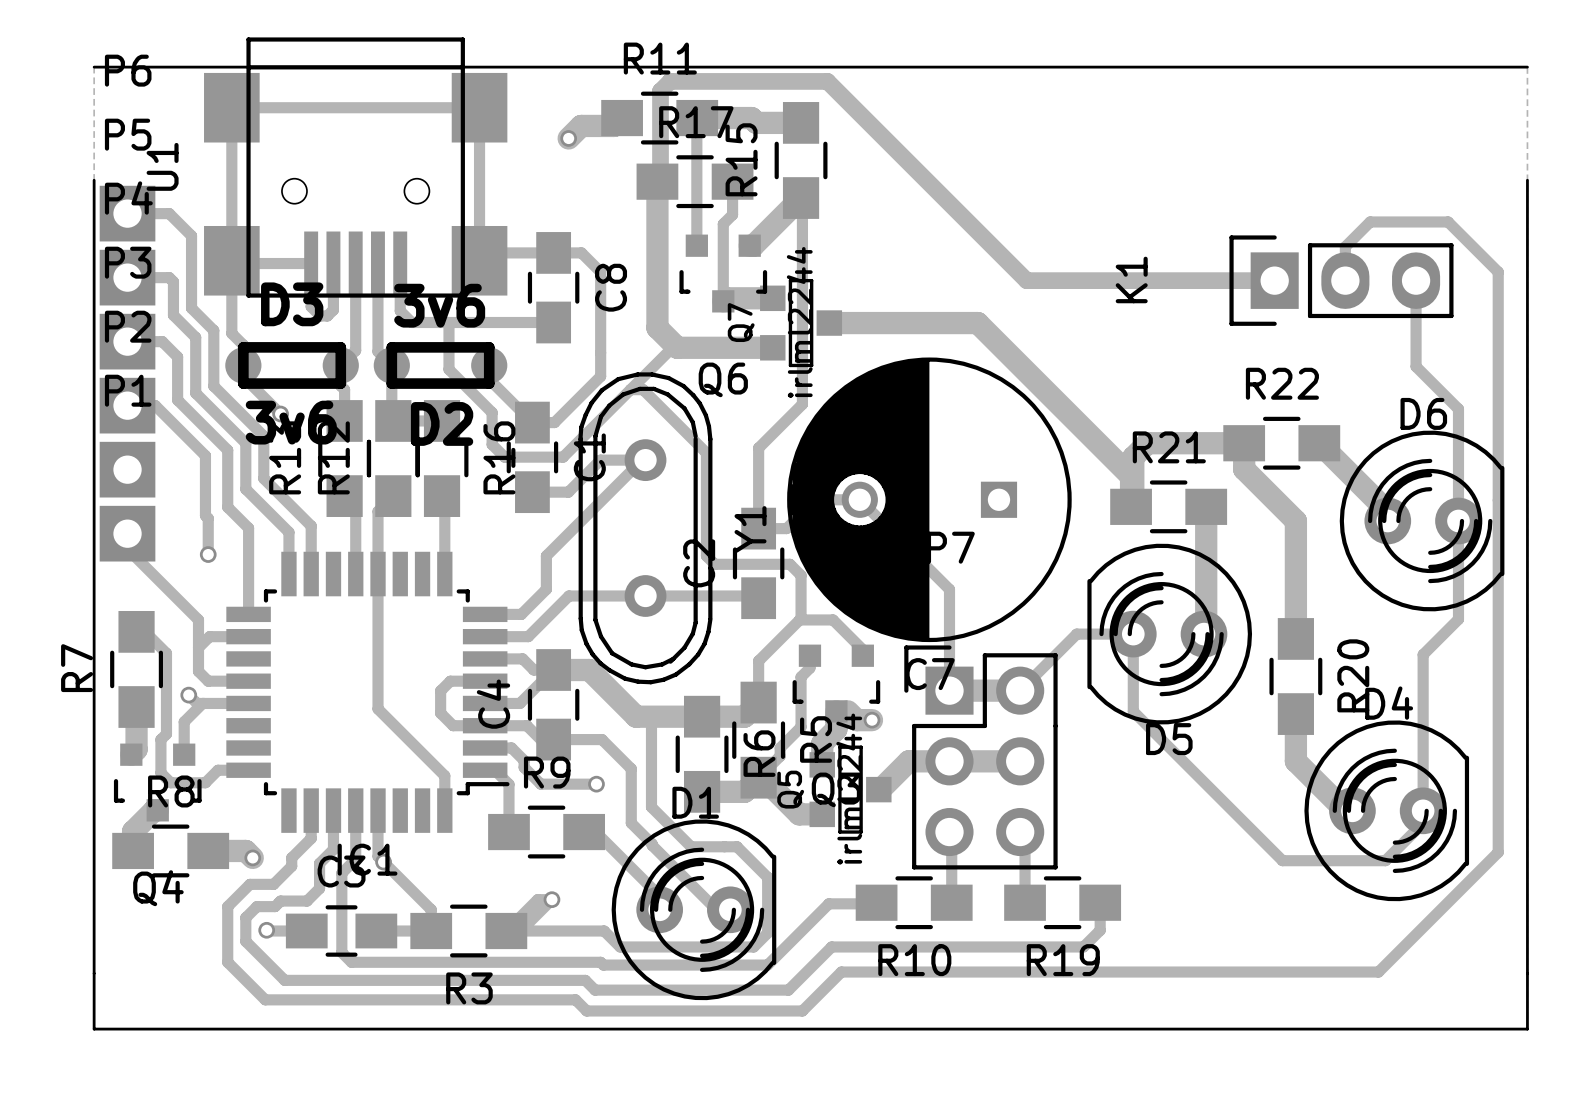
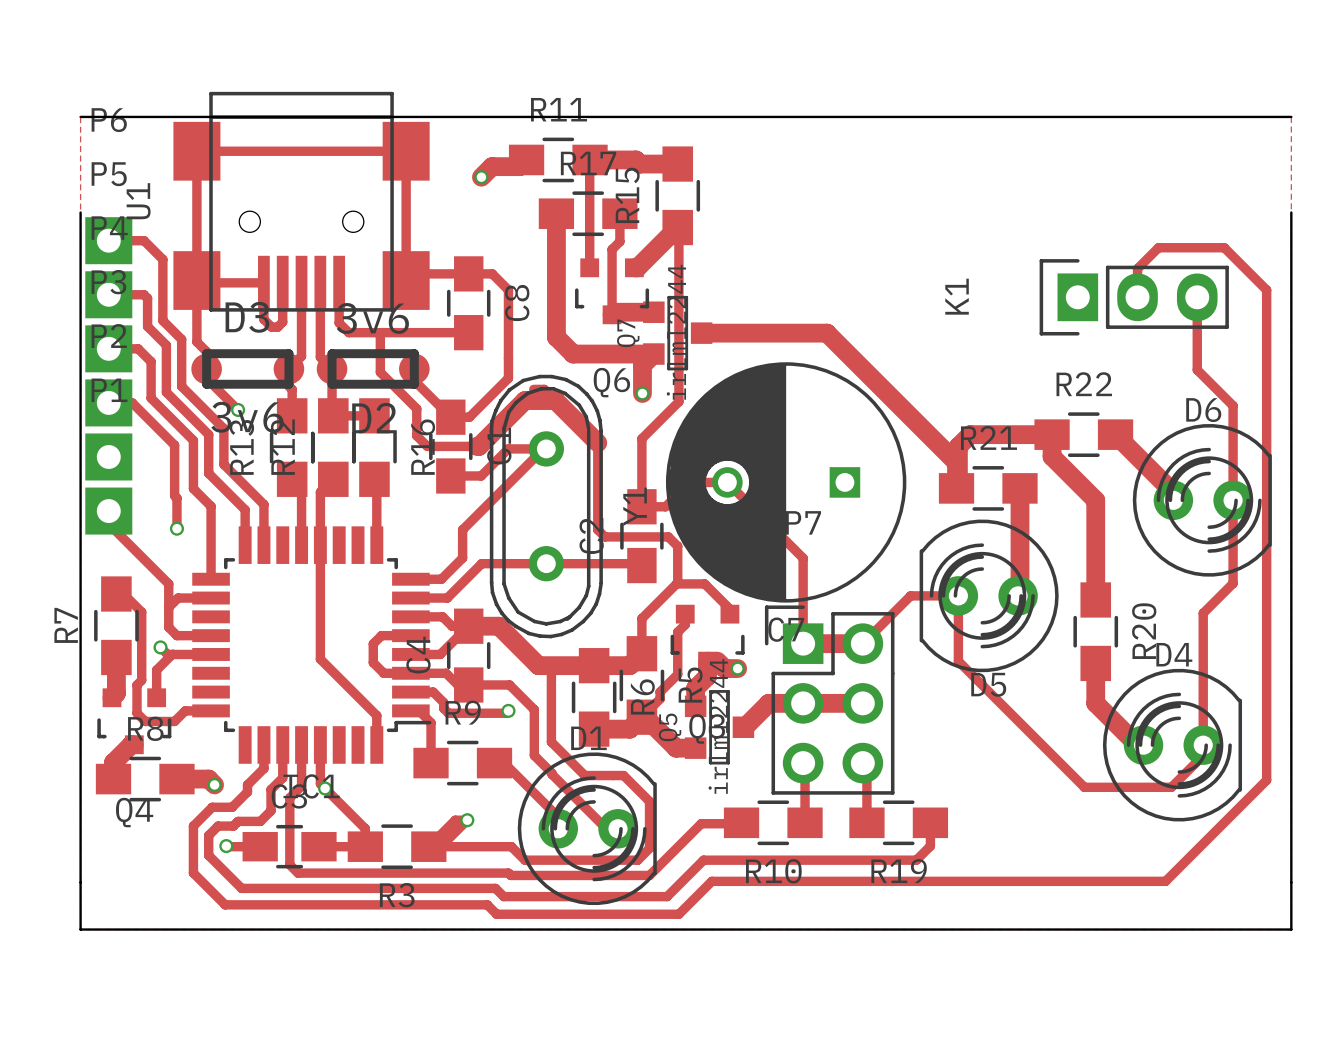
track: (660, 178) (660, 91) (670, 81) (827, 81) (1026, 280) (1274, 280) -> none
track: (672, 347) (563, 457) -> (555, 400) (524, 400) (479, 446) (476, 446)
track: none -> (653, 354) (642, 365) (642, 393)
via: none -> (642, 393)
track width: thin (656, 402) (706, 452) -> thick (555, 400) (597, 442)
track: (529, 773) (540, 784) (596, 784) -> (448, 713) (506, 713) (508, 710)
via position: (596, 784) -> (508, 710)

